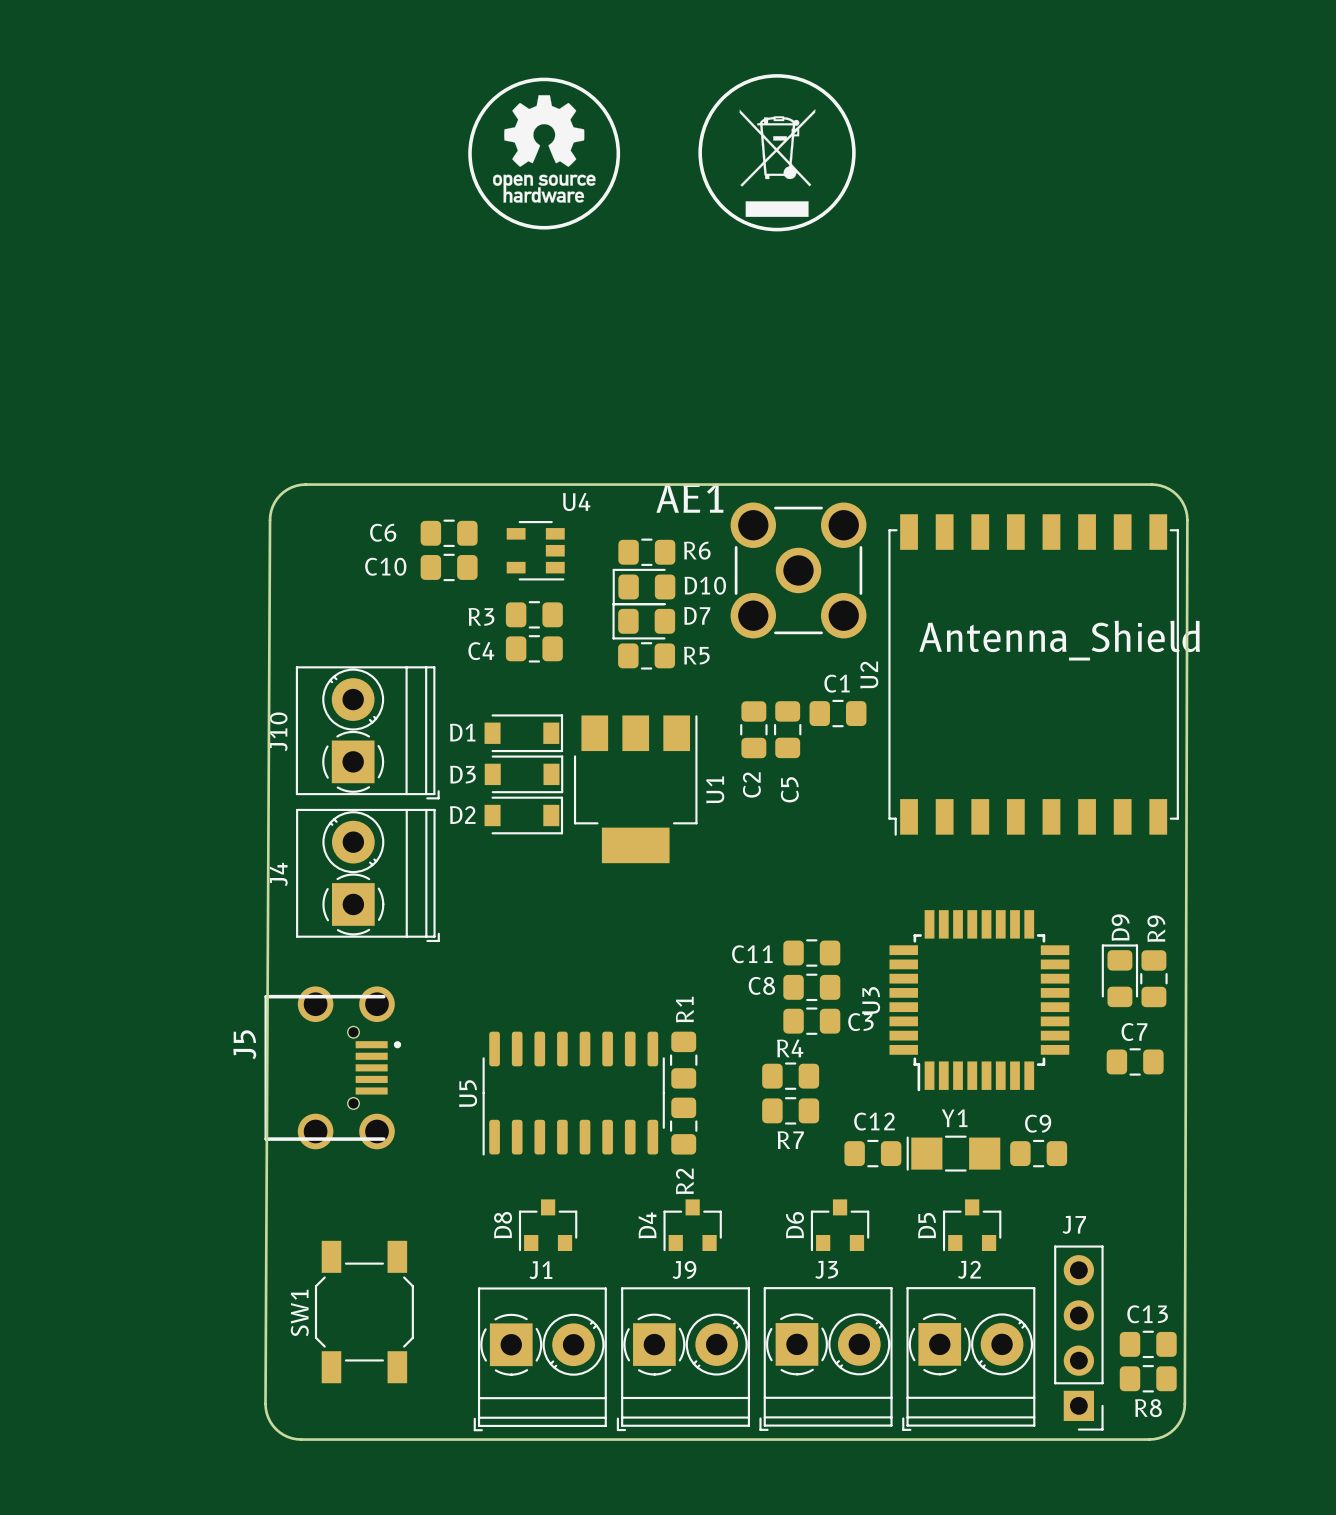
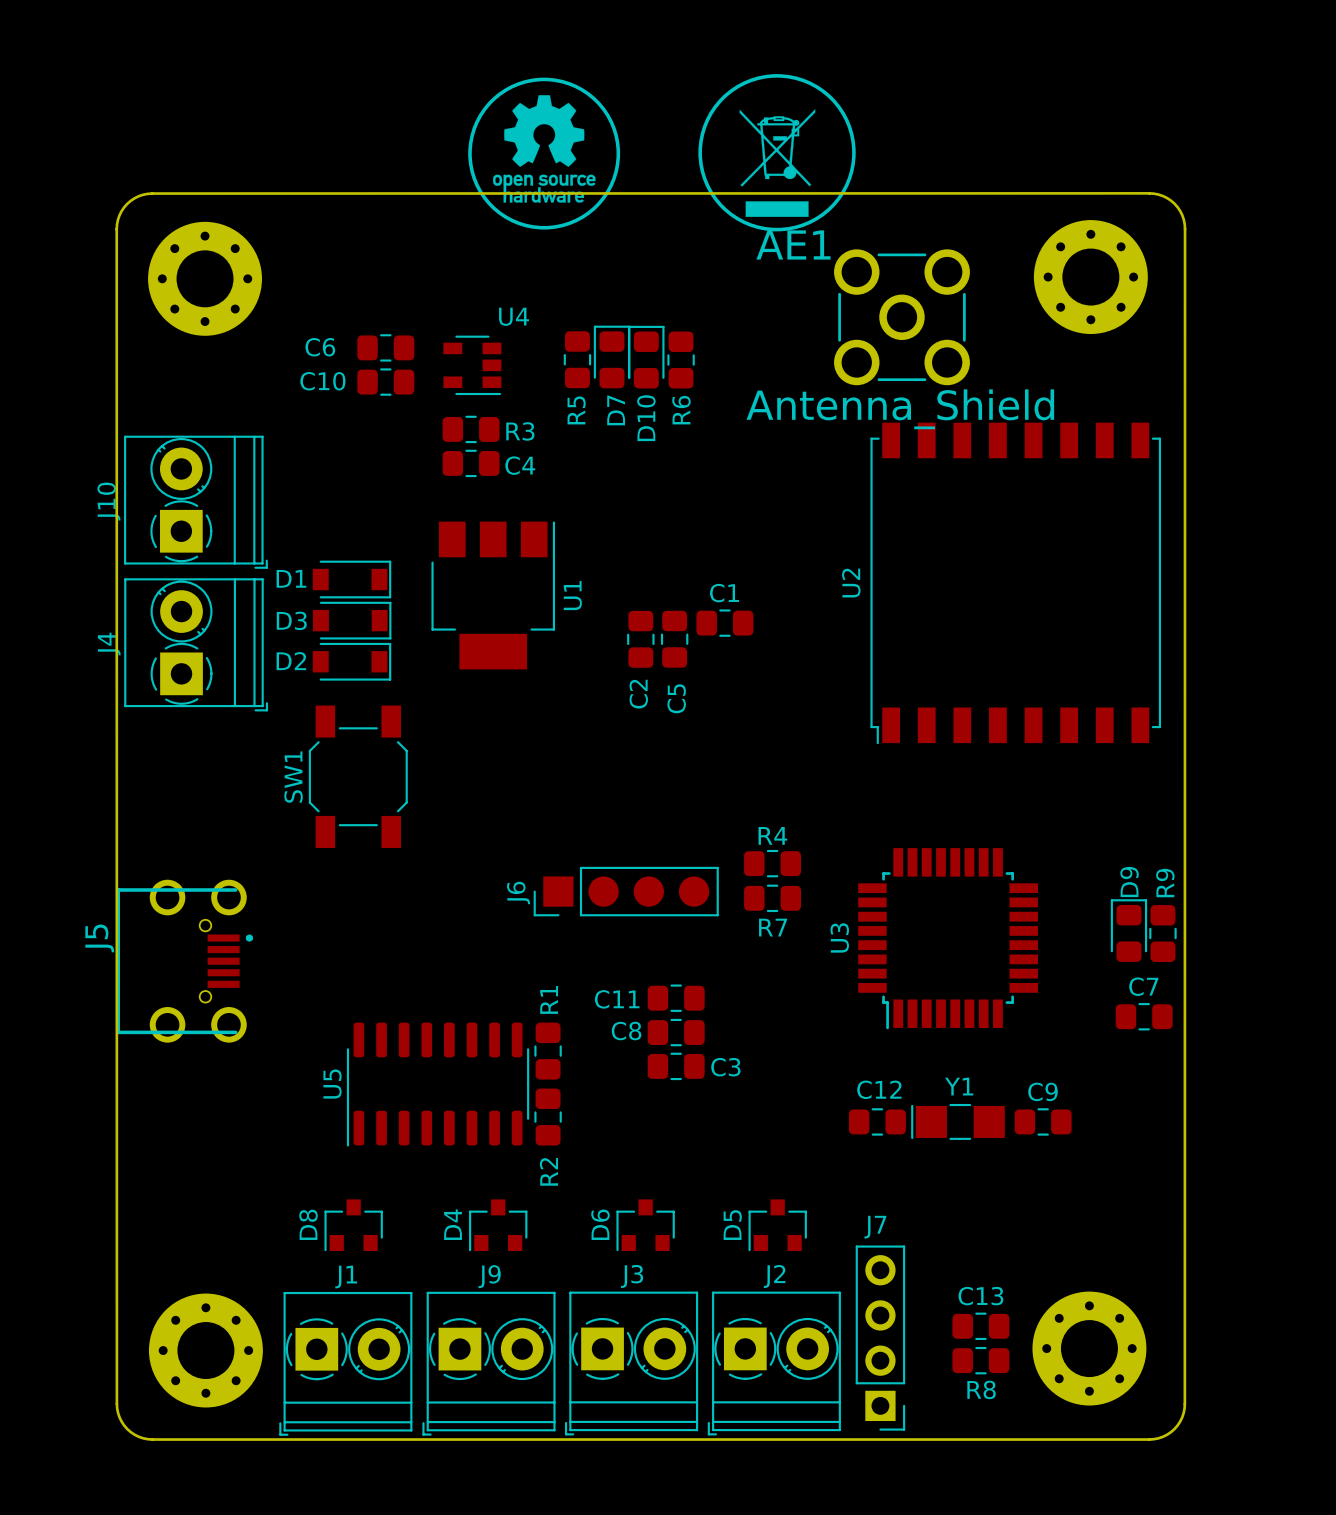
part: none -> (1090, 277)
part: none -> (205, 278)
C6 position: (449, 533) -> (385, 347)
U4 position: (535, 550) -> (472, 365)
R6 rotation: 0° (646, 552) -> 90° clockwise (681, 360)
R6 position: (646, 552) -> (681, 360)
C10 position: (449, 567) -> (385, 382)
AE1 position: (798, 570) -> (901, 317)
D10 rotation: 0° (643, 586) -> 90° clockwise (646, 357)
D10 position: (643, 586) -> (646, 357)
R3 position: (534, 614) -> (471, 429)
R3 name position: R3 (481, 616) -> R3 (520, 431)
D7 rotation: 0° (643, 621) -> 90° clockwise (611, 356)
D7 position: (643, 621) -> (611, 356)
AE1 value position: Antenna_Shield (1059, 640) -> Antenna_Shield (900, 409)
C4 position: (534, 648) -> (471, 463)
C4 name position: C4 (481, 651) -> C4 (520, 465)
R5 rotation: 0° (646, 655) -> 90° clockwise (577, 359)
R5 position: (646, 655) -> (577, 359)
U2 position: (1033, 674) -> (1015, 583)
C1 position: (837, 713) -> (724, 623)
C2 position: (753, 729) -> (640, 639)
C5 position: (787, 729) -> (674, 639)
J10 position: (367, 732) -> (195, 502)
D1 position: (523, 733) -> (351, 579)
D3 position: (523, 774) -> (352, 620)
U1 position: (635, 789) -> (493, 595)
D2 position: (523, 815) -> (351, 661)
J4 position: (367, 875) -> (196, 644)
J6: none -> (626, 891)
C11 position: (811, 952) -> (676, 998)
D9 position: (1119, 975) -> (1128, 930)
R9 position: (1153, 978) -> (1162, 933)
C8 position: (811, 987) -> (676, 1032)
U3 position: (979, 1000) -> (948, 938)
C3 position: (811, 1021) -> (676, 1066)
R1 position: (683, 1060) -> (548, 1051)
C7 position: (1135, 1061) -> (1144, 1016)
J5 position: (332, 1067) -> (184, 961)
R4 position: (790, 1076) -> (772, 863)
U5 position: (573, 1093) -> (438, 1084)
R7 position: (790, 1110) -> (772, 898)
R2 position: (683, 1126) -> (548, 1117)
C12 position: (872, 1153) -> (877, 1121)
Y1 position: (953, 1153) -> (957, 1121)
C9 position: (1038, 1153) -> (1043, 1121)
D8 position: (548, 1225) -> (353, 1225)
D4 position: (692, 1225) -> (498, 1225)
D6 position: (840, 1225) -> (645, 1225)
D5 position: (972, 1225) -> (777, 1225)
SW1 position: (364, 1312) -> (358, 776)
J7 position: (1078, 1338) -> (880, 1338)
C13 position: (1148, 1344) -> (980, 1326)
part: none -> (1089, 1348)
part: none -> (205, 1350)
J3 position: (826, 1358) -> (631, 1363)
J2 position: (968, 1358) -> (774, 1363)
J1 position: (540, 1359) -> (345, 1363)
J9 position: (683, 1359) -> (488, 1363)
R8 position: (1148, 1378) -> (980, 1360)
board edge: (1184, 1403) (1187, 520) (1184, 506) (1176, 494) (1165, 487) (1151, 484) (305, 484) (292, 487) (280, 494) (272, 506) (270, 520) (265, 1403) (268, 1417) (275, 1429) (287, 1436) (301, 1439) -> (1184, 1403) (1185, 228) (1182, 215) (1177, 207) (1167, 198) (1149, 193) (147, 193) (138, 196) (127, 203) (119, 215) (116, 229) (117, 1408) (121, 1421) (127, 1429) (134, 1434) (147, 1439) (301, 1439)

